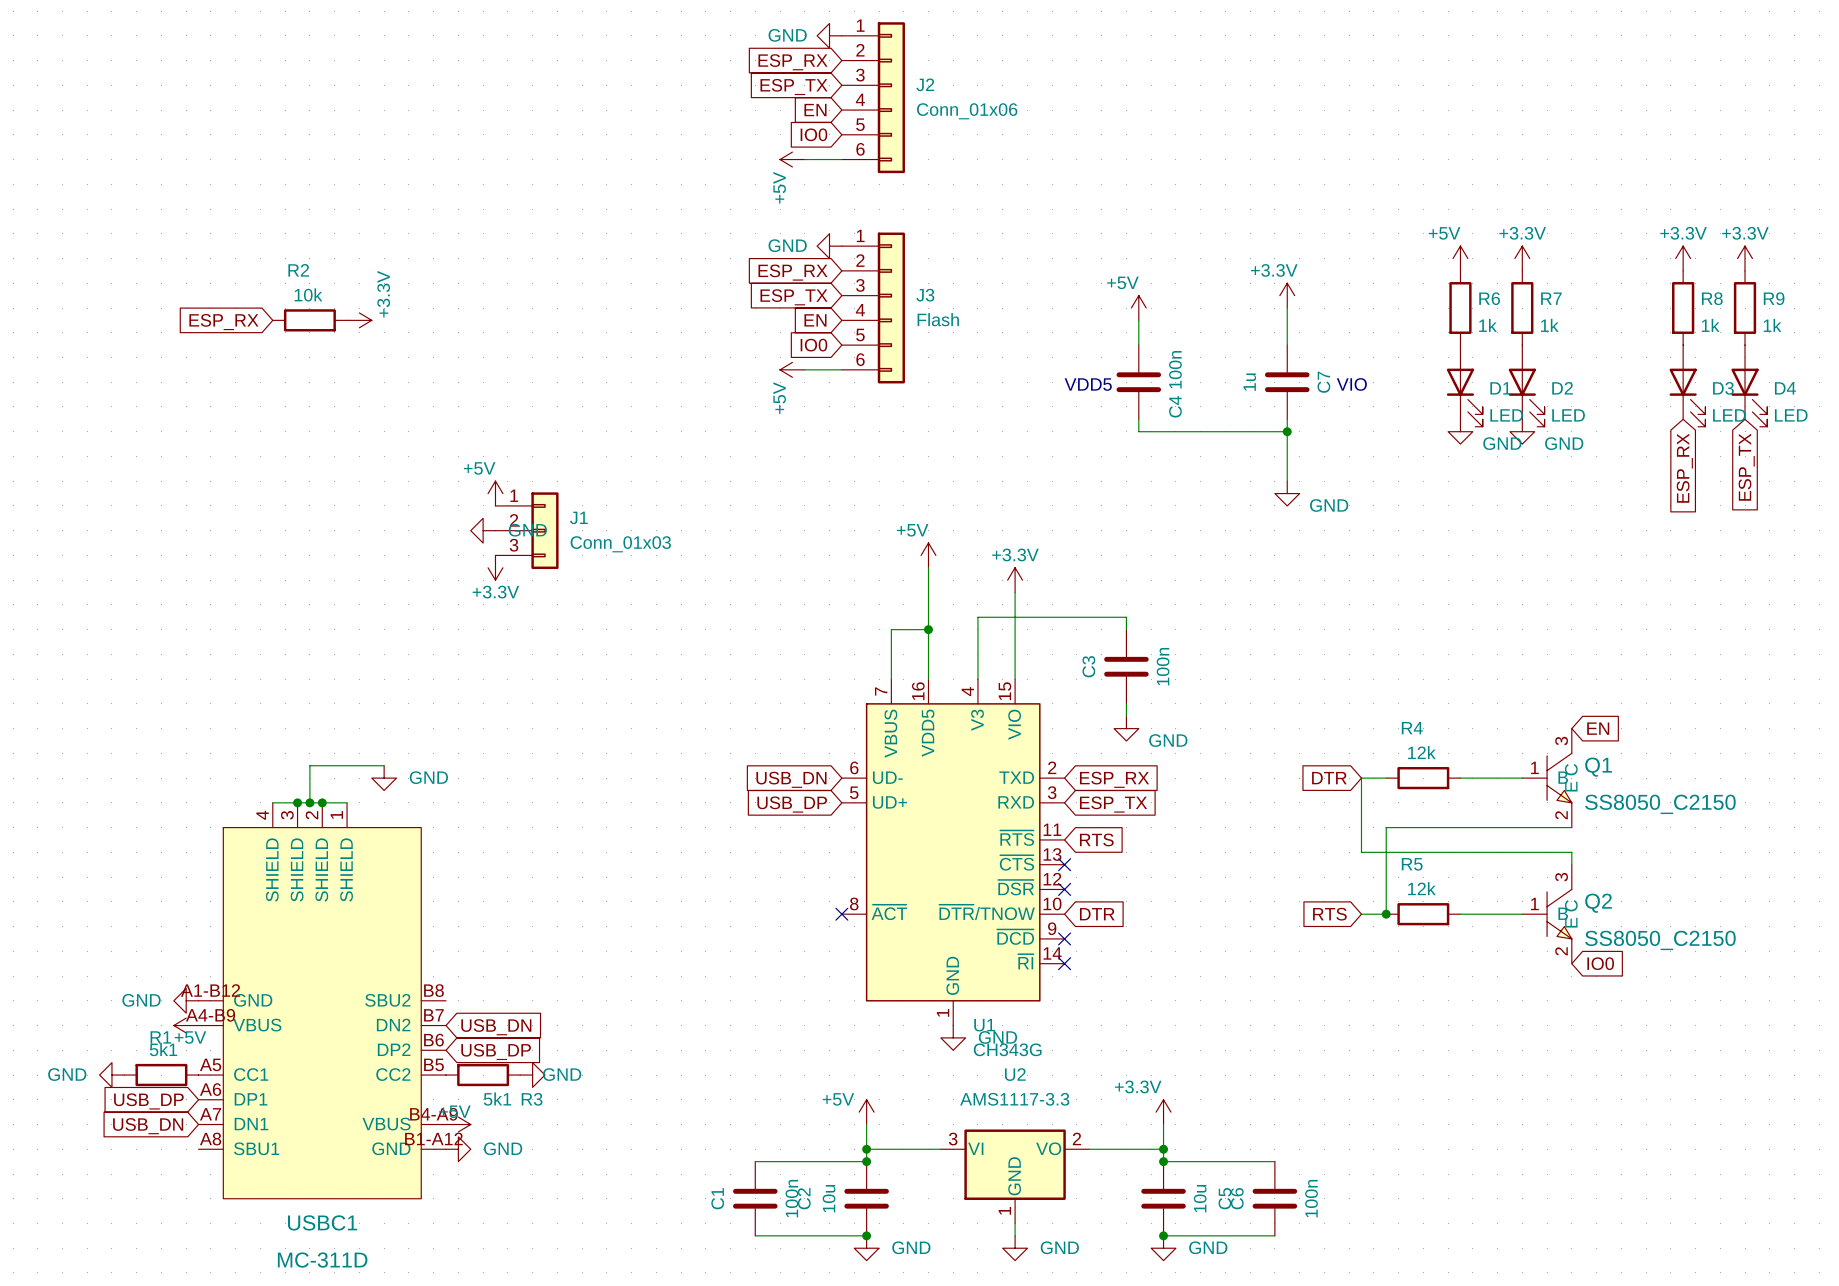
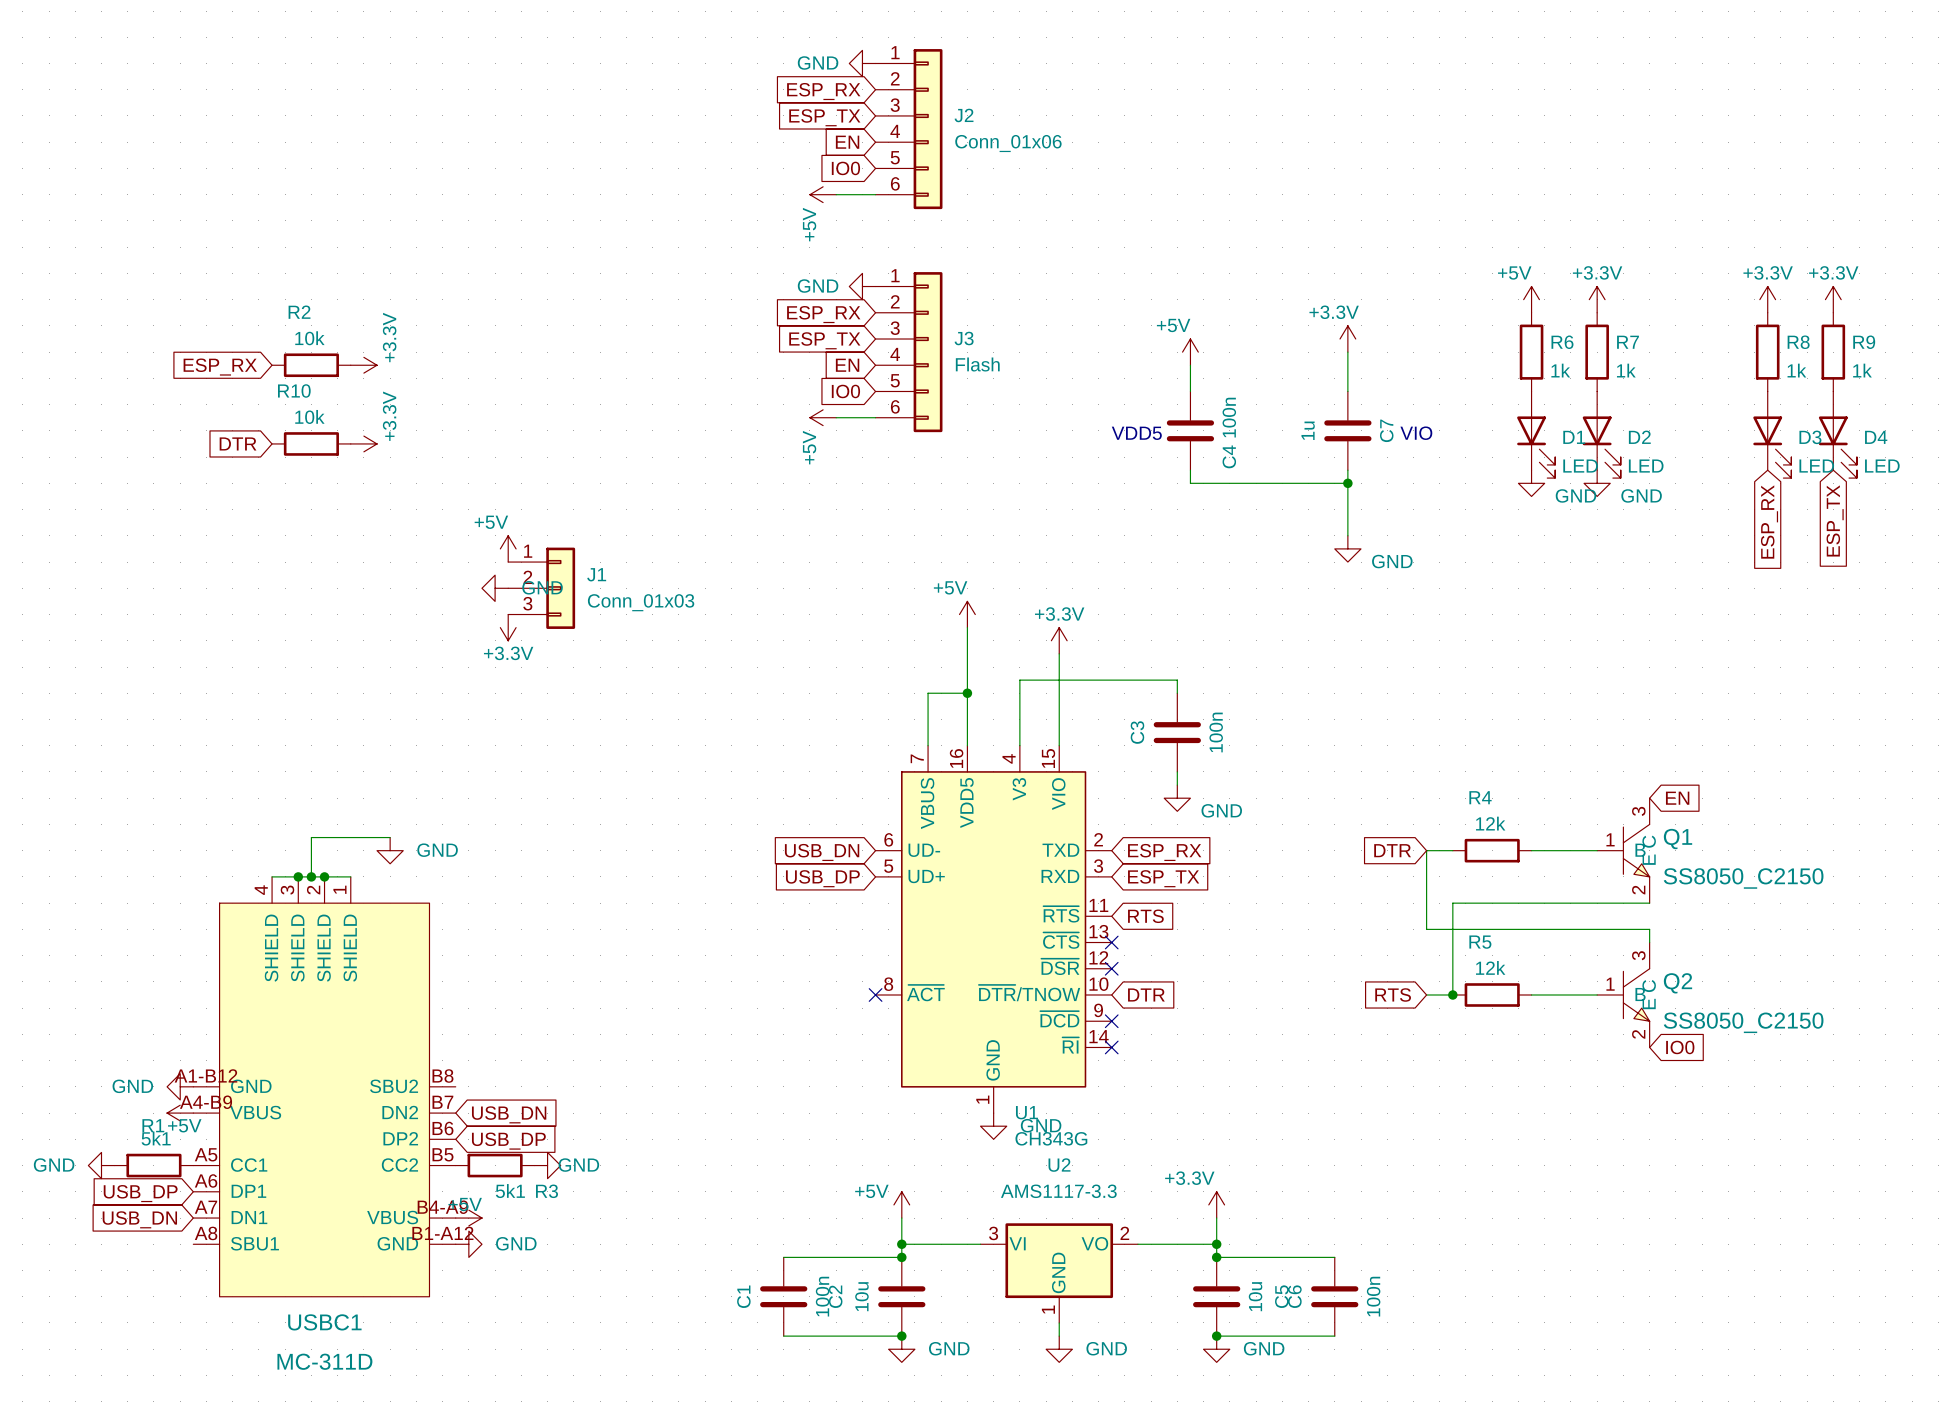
global label: none -> DTR (238, 443)
R10: none -> 10k (311, 443)
power symbol: none -> +3.3V (363, 443)

